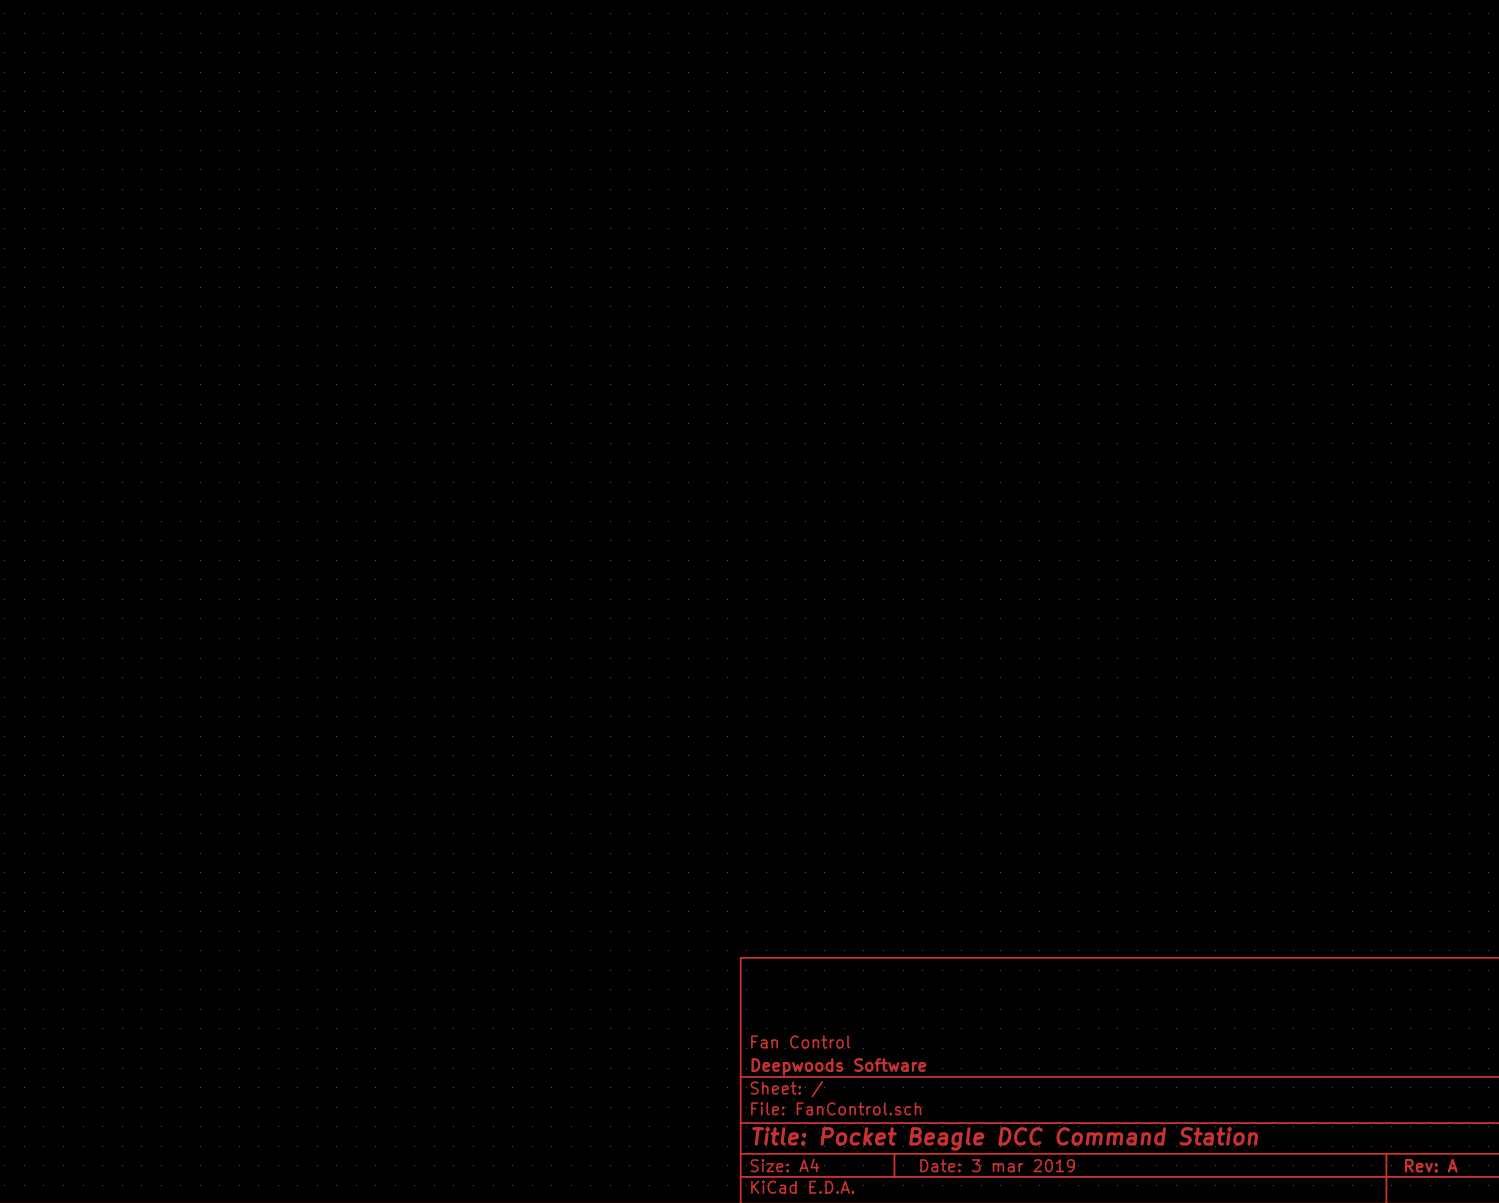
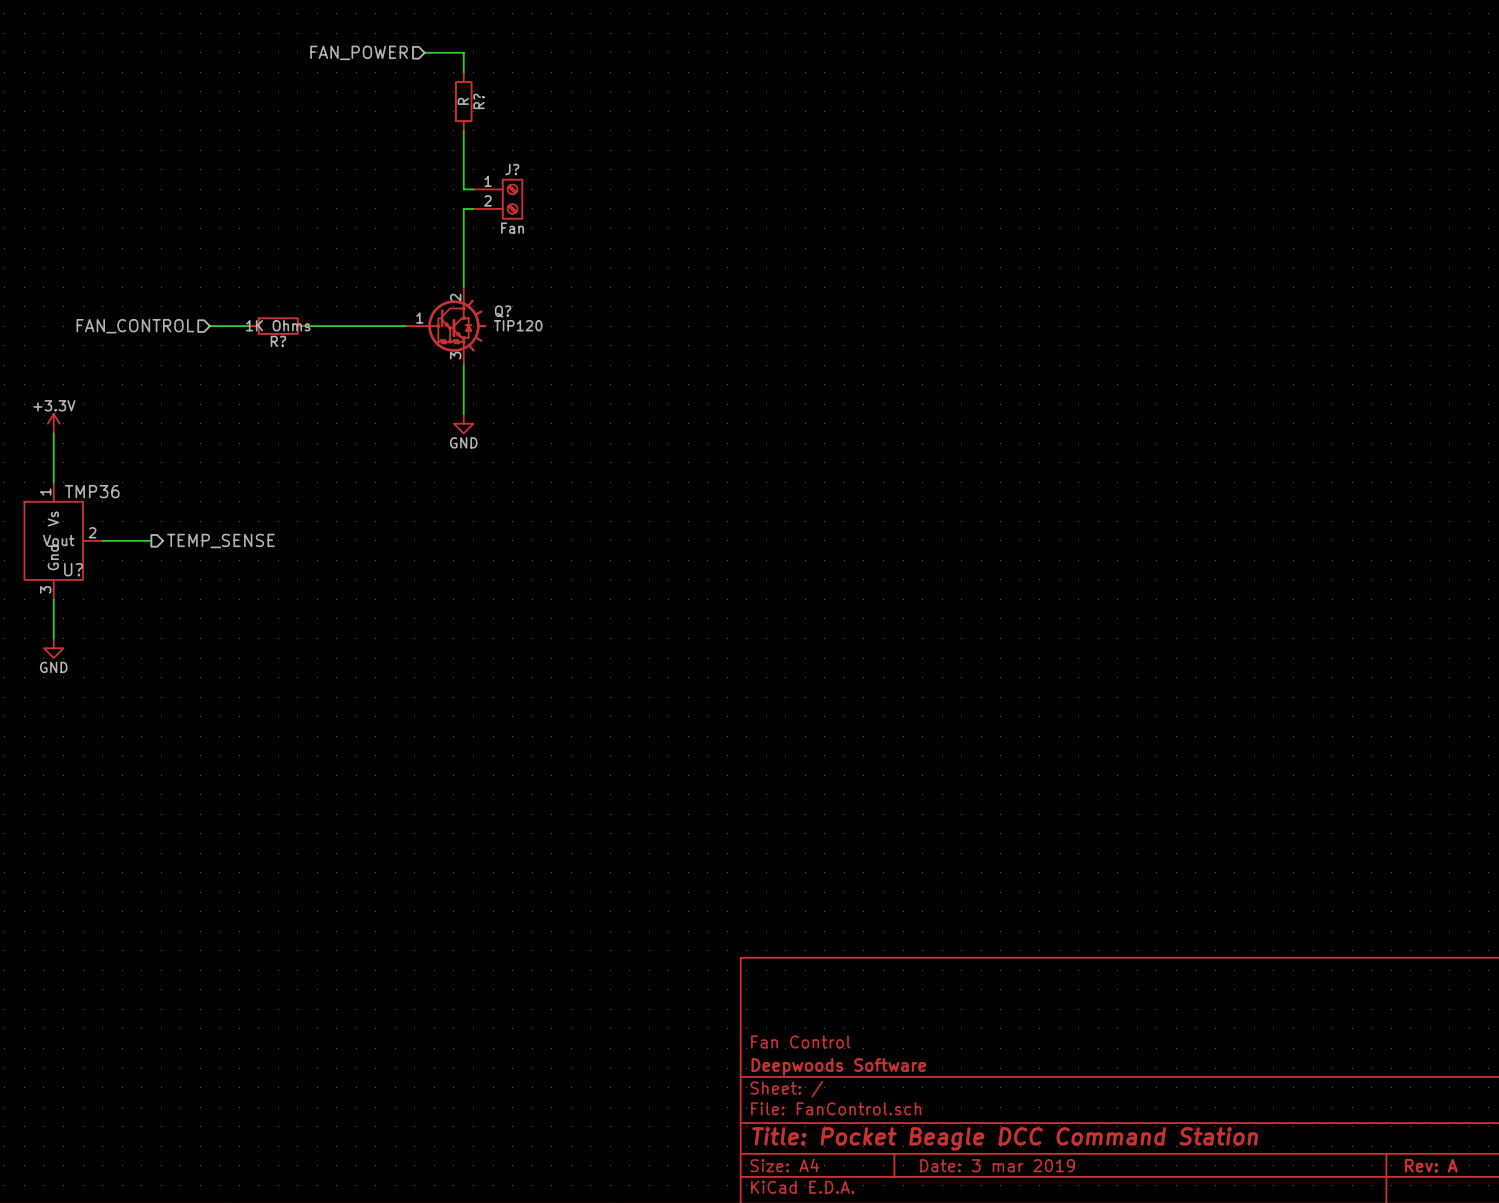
hierarchical label: none -> FAN_POWER (359, 52)
wire: none -> (424, 52) (463, 52) (463, 72)
R?: none -> R (463, 101)
wire: none -> (463, 130) (463, 189) (473, 189)
J?: none -> Fan (498, 199)
wire: none -> (473, 208) (463, 208) (463, 287)
hierarchical label: none -> FAN_CONTROL (135, 326)
wire: none -> (209, 326) (248, 326)
R?: none -> 1K Ohms (278, 326)
wire: none -> (307, 326) (405, 326)
Q?: none -> TIP120 (445, 326)
wire: none -> (463, 365) (463, 413)
power symbol: none -> +3.3V (53, 423)
power symbol: none -> GND (463, 423)
wire: none -> (53, 433) (53, 482)
U?: none -> TMP36 (63, 540)
wire: none -> (102, 540) (151, 540)
hierarchical label: none -> TEMP_SENSE (220, 540)
wire: none -> (53, 599) (53, 638)
power symbol: none -> GND (53, 648)

